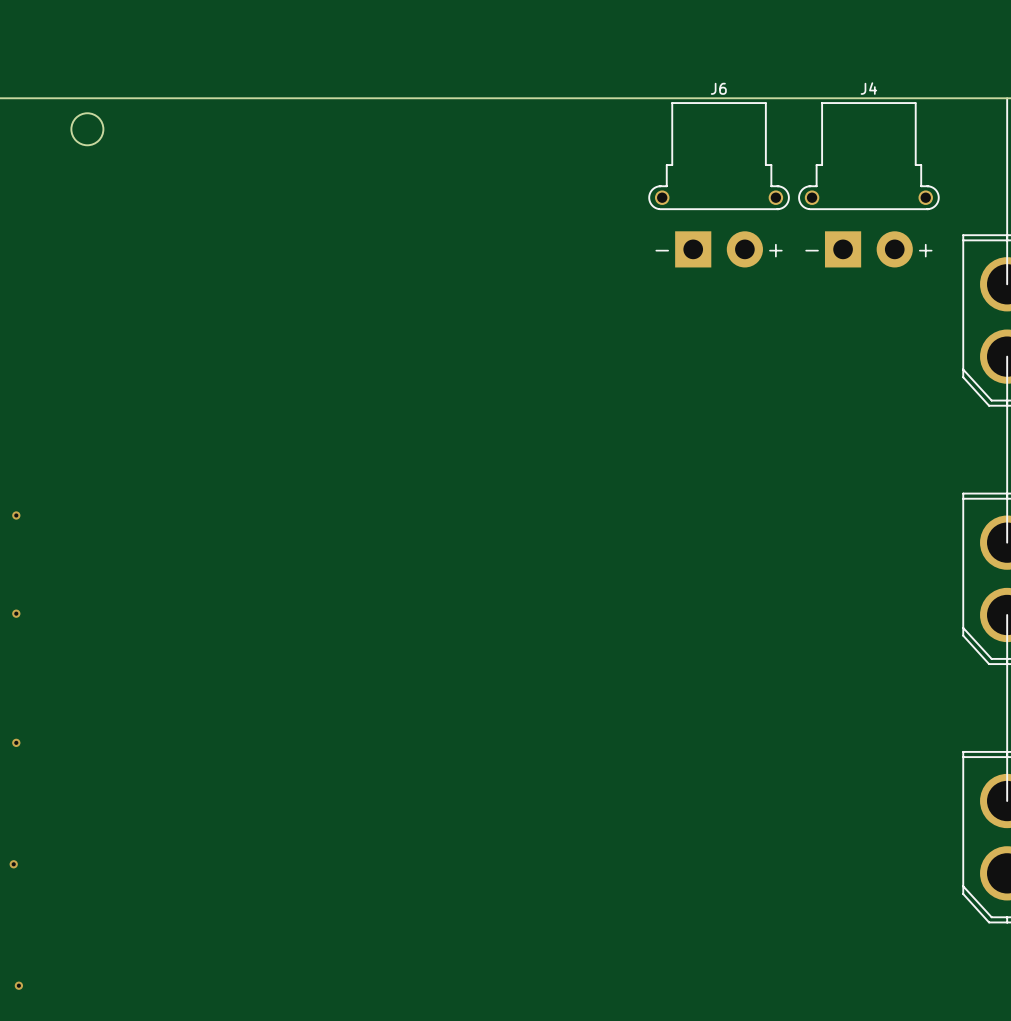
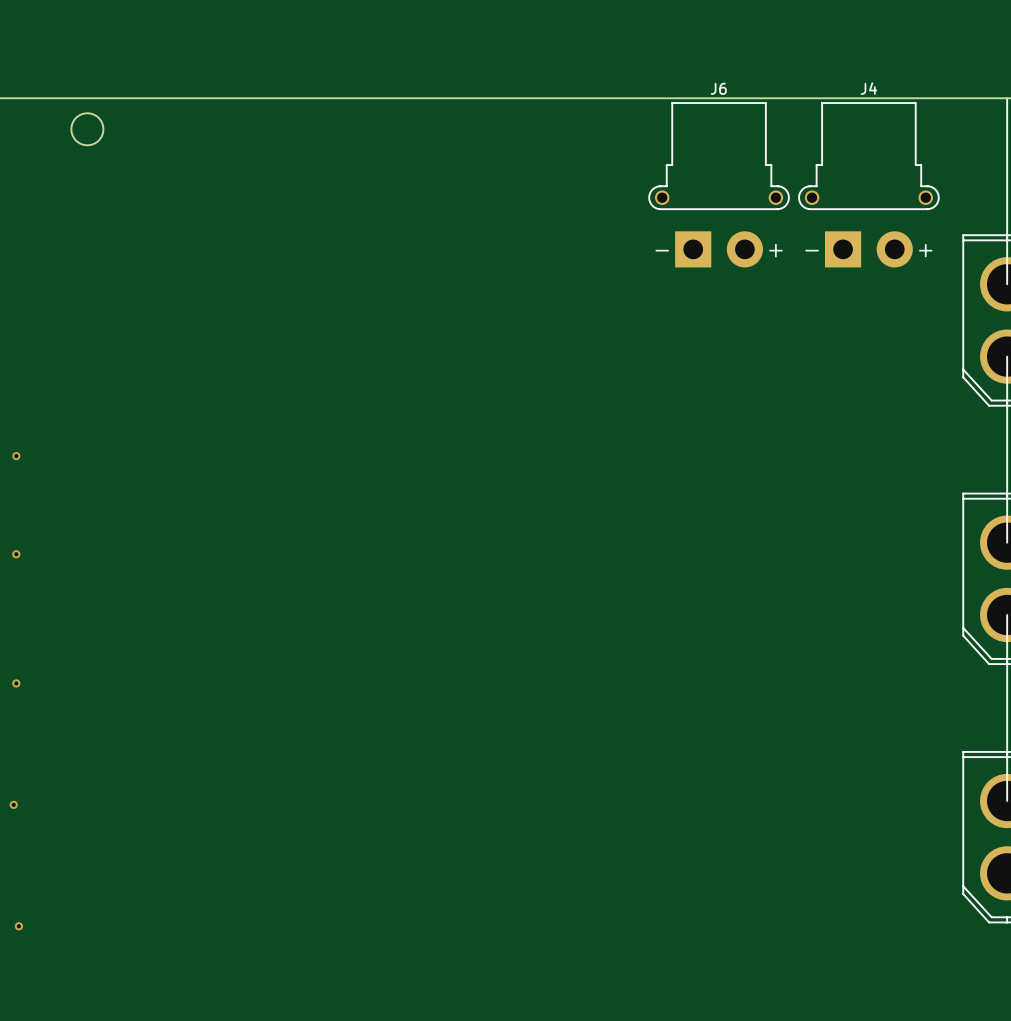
via: none -> (16, 456)
via: (16, 515) -> none
via: none -> (16, 554)
via: (16, 613) -> none
via: none -> (16, 683)
via: (16, 742) -> none
via: none -> (13, 804)
via: (13, 864) -> none
via: none -> (18, 926)
via: (18, 985) -> none

